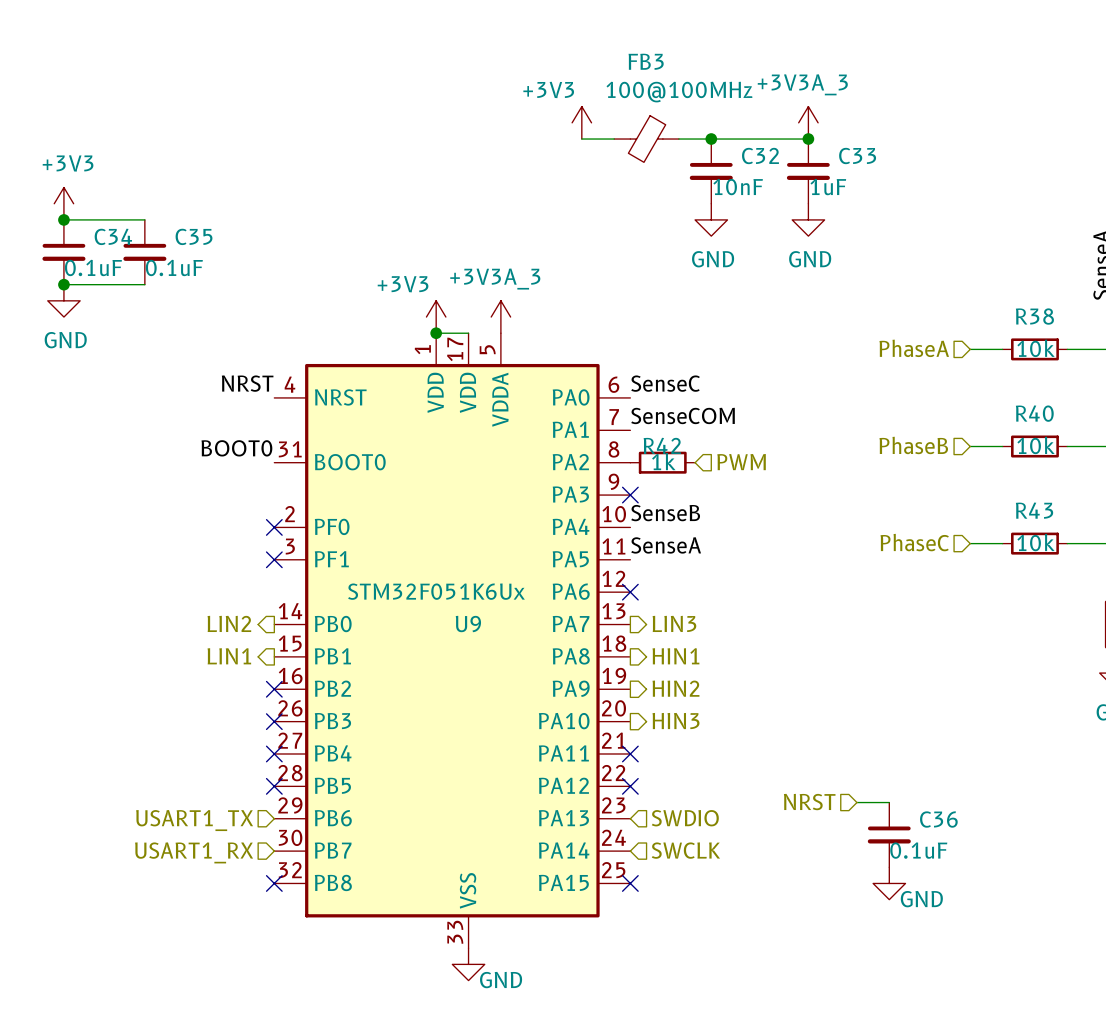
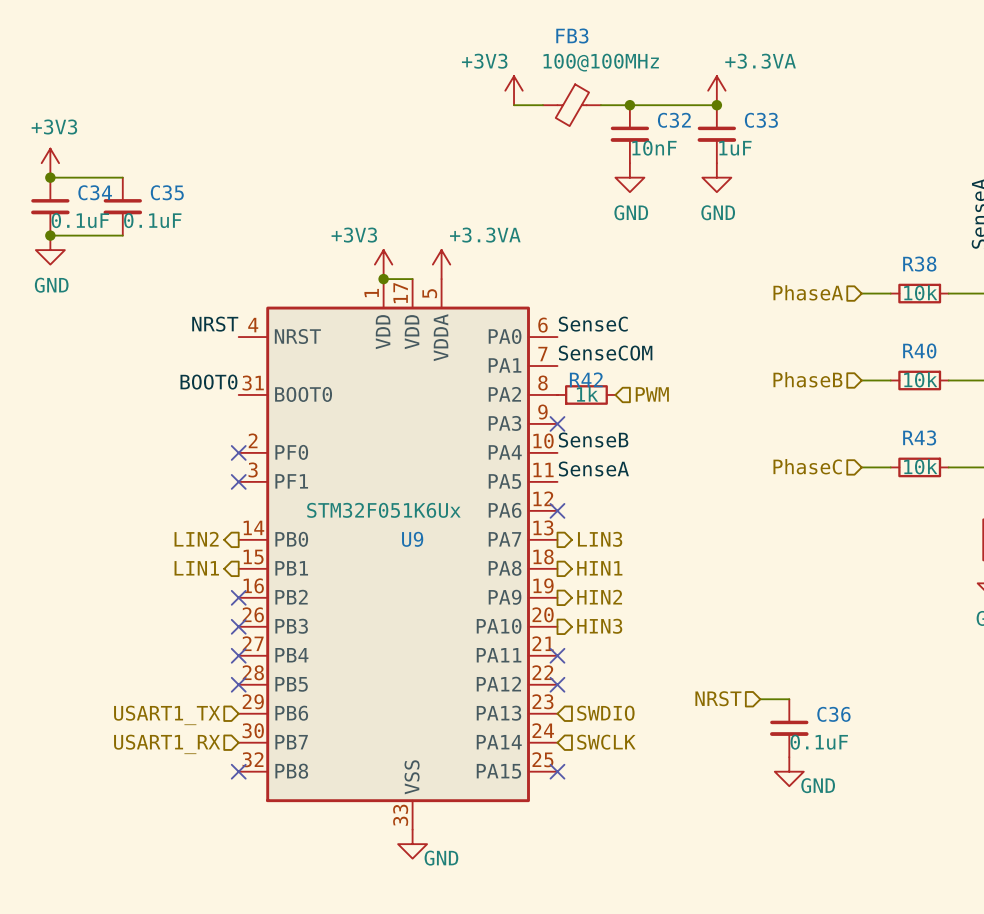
power symbol: +3V3A_3 (808, 122) -> +3.3VA (716, 90)
power symbol: +3V3A_3 (500, 317) -> +3.3VA (441, 264)

